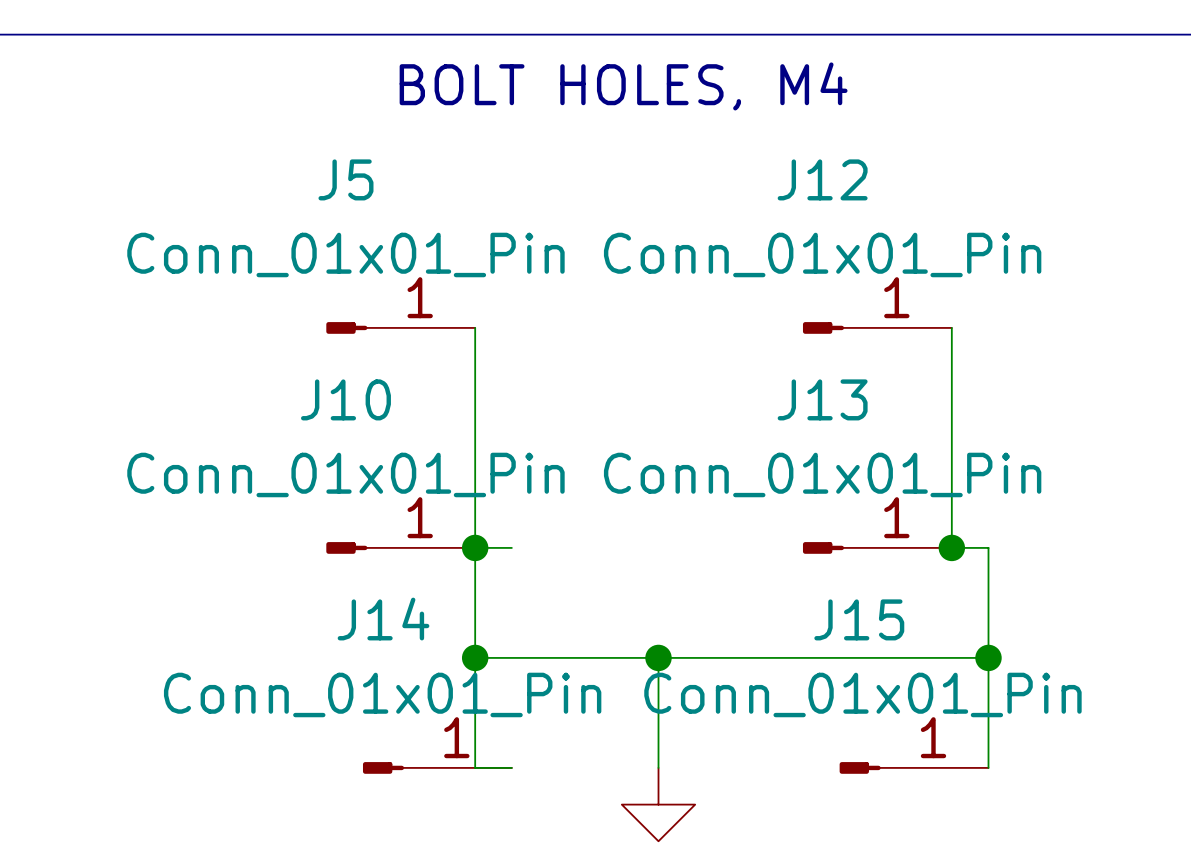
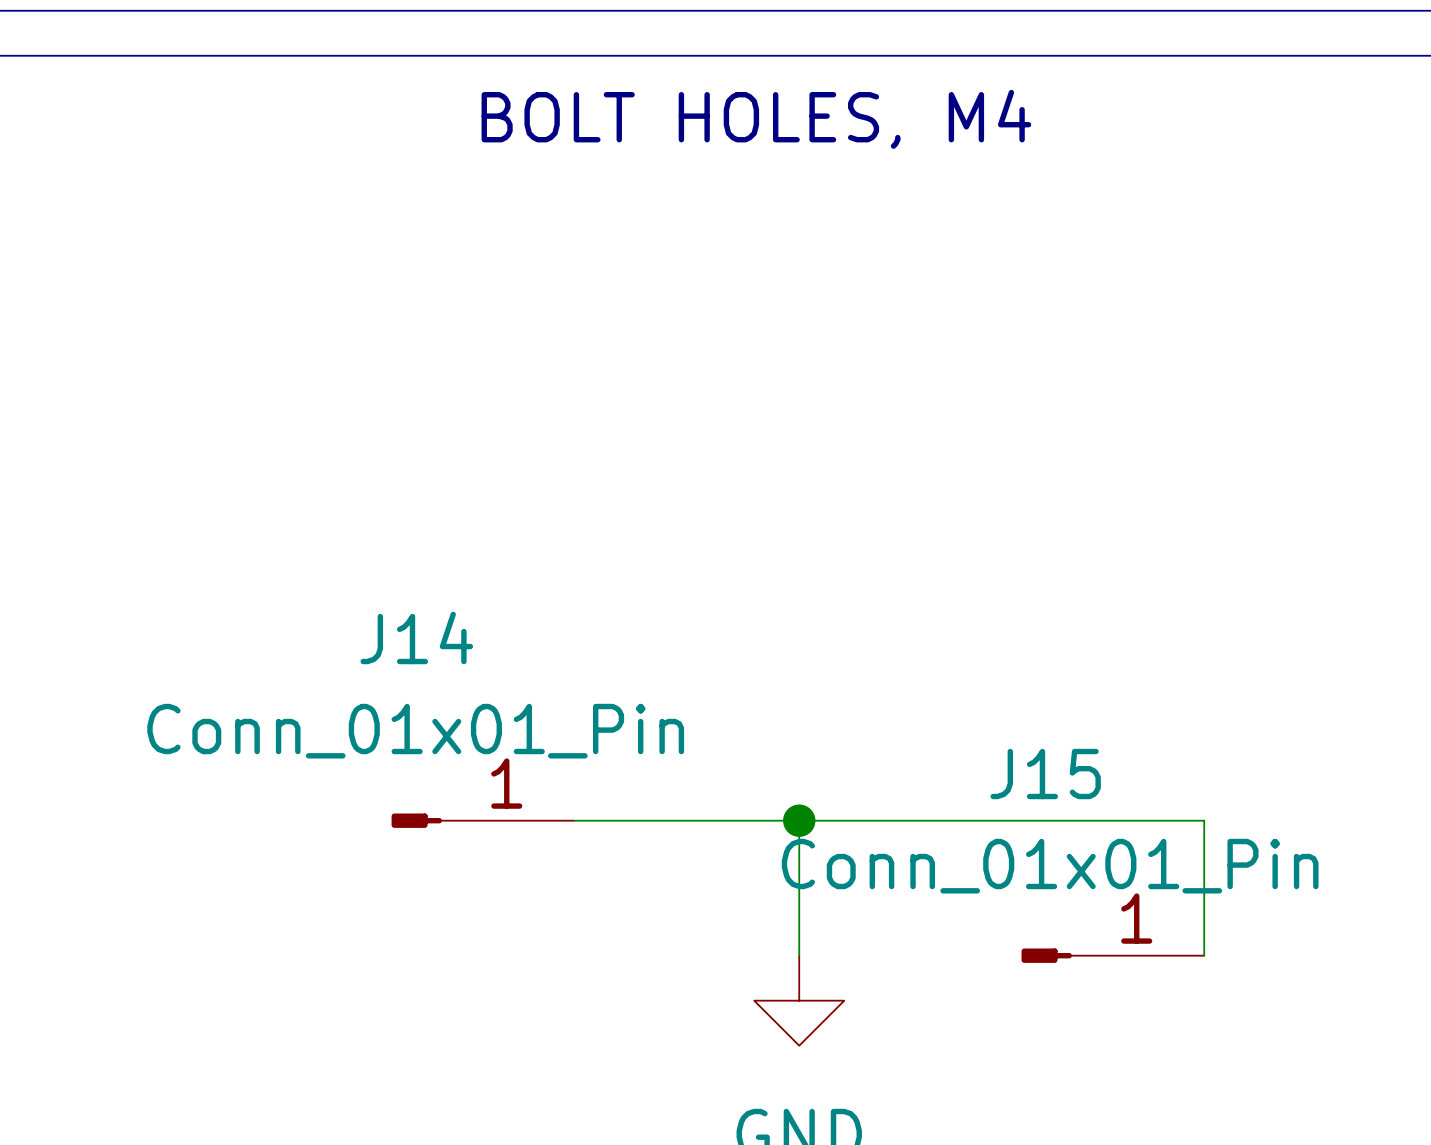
J5: Conn_01x01_Pin (400, 327) -> none
wire: (475, 327) (475, 767) (511, 767) -> none
J12: Conn_01x01_Pin (877, 327) -> none
wire: (951, 327) (951, 547) (988, 547) (988, 657) -> none
J10: Conn_01x01_Pin (400, 547) -> none
wire: (475, 547) (511, 547) -> none
junction: (475, 547) -> none
J13: Conn_01x01_Pin (877, 547) -> none
junction: (951, 547) -> none
junction: (475, 657) -> none
junction: (988, 657) -> none
J14 position: (437, 767) -> (482, 820)

